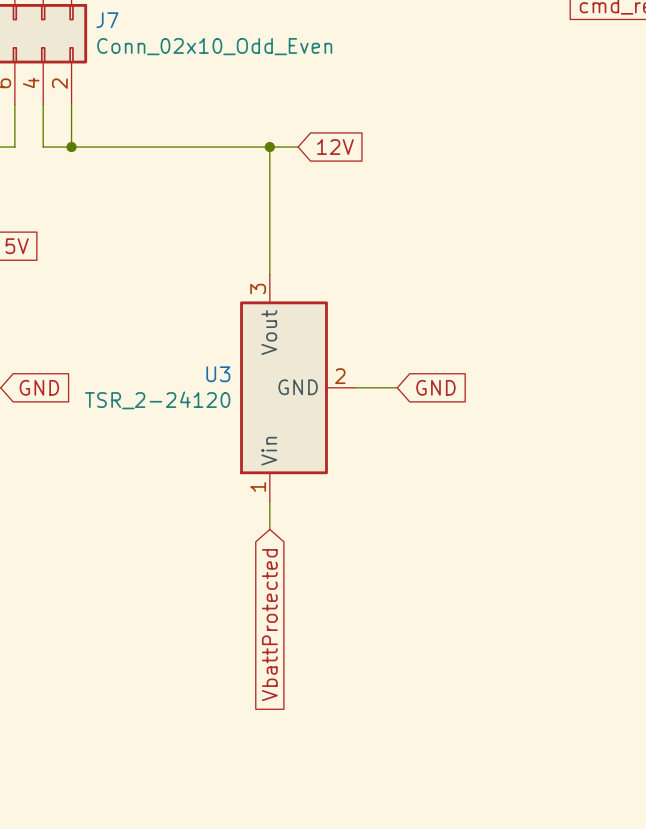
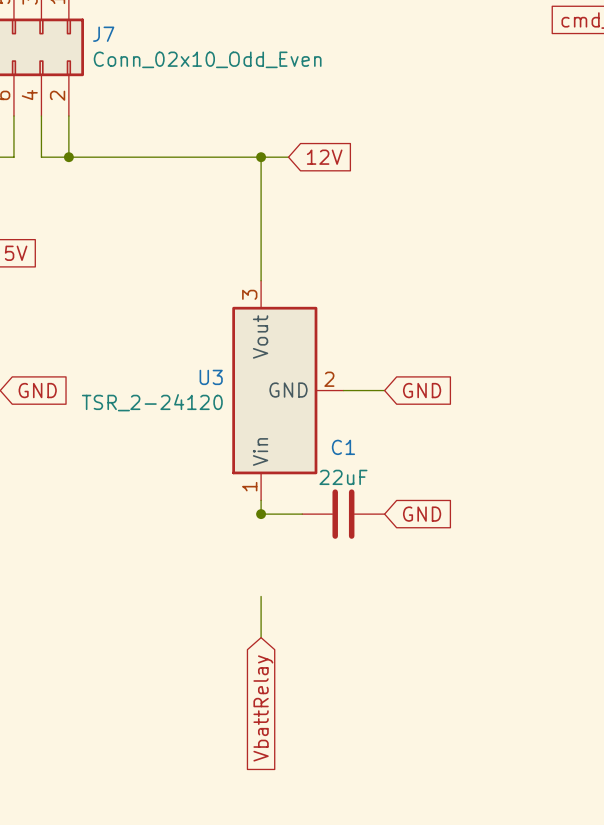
wire: (269, 515) (269, 529) -> (261, 514) (302, 514)
junction: none -> (261, 514)
C1: none -> 22uF (343, 514)
global label: none -> GND (422, 514)
wire: none -> (261, 596) (261, 637)
global label: VbattProtected (269, 625) -> none
global label: none -> VbattRelay (263, 708)

